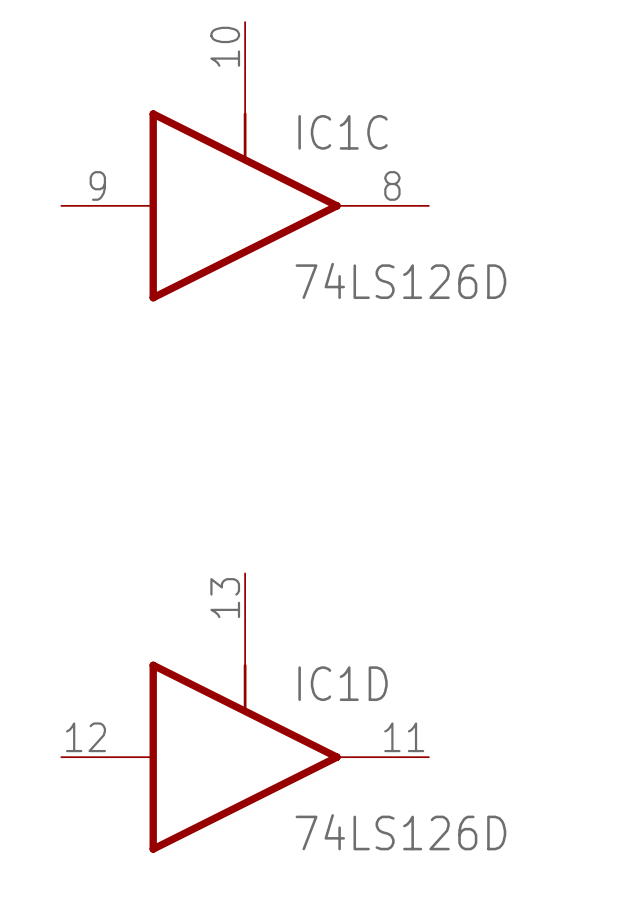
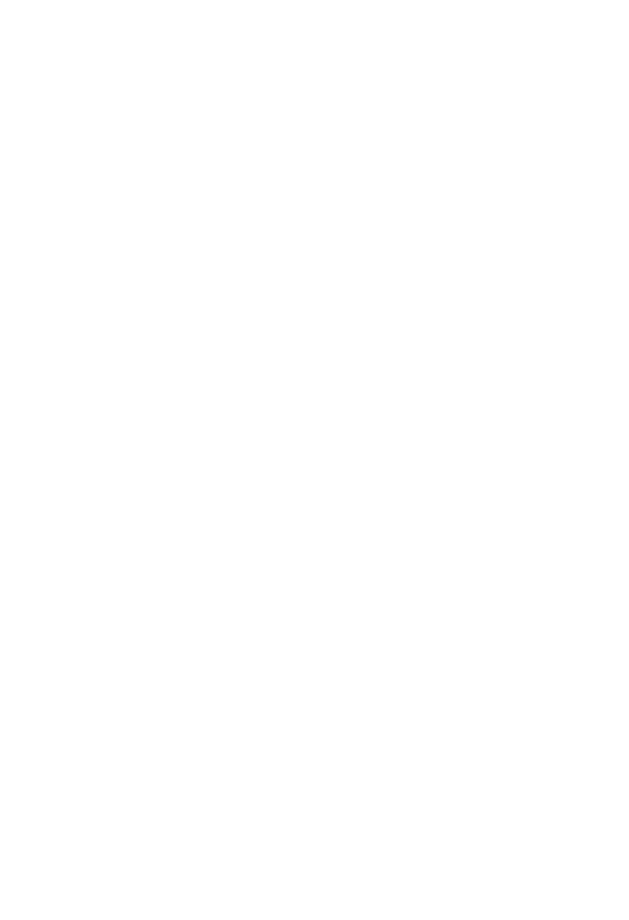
IC1C: 74LS126D (245, 161) -> none
IC1D: 74LS126D (245, 713) -> none

